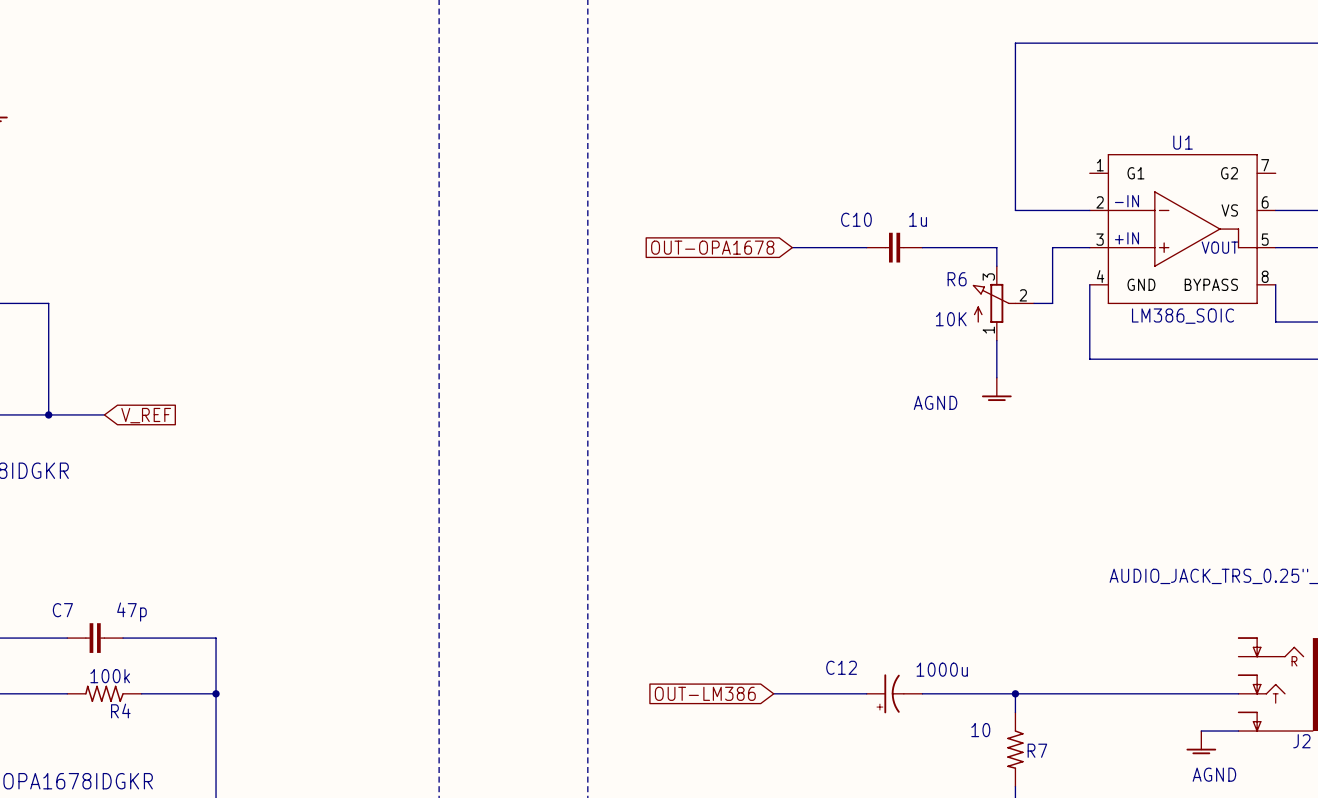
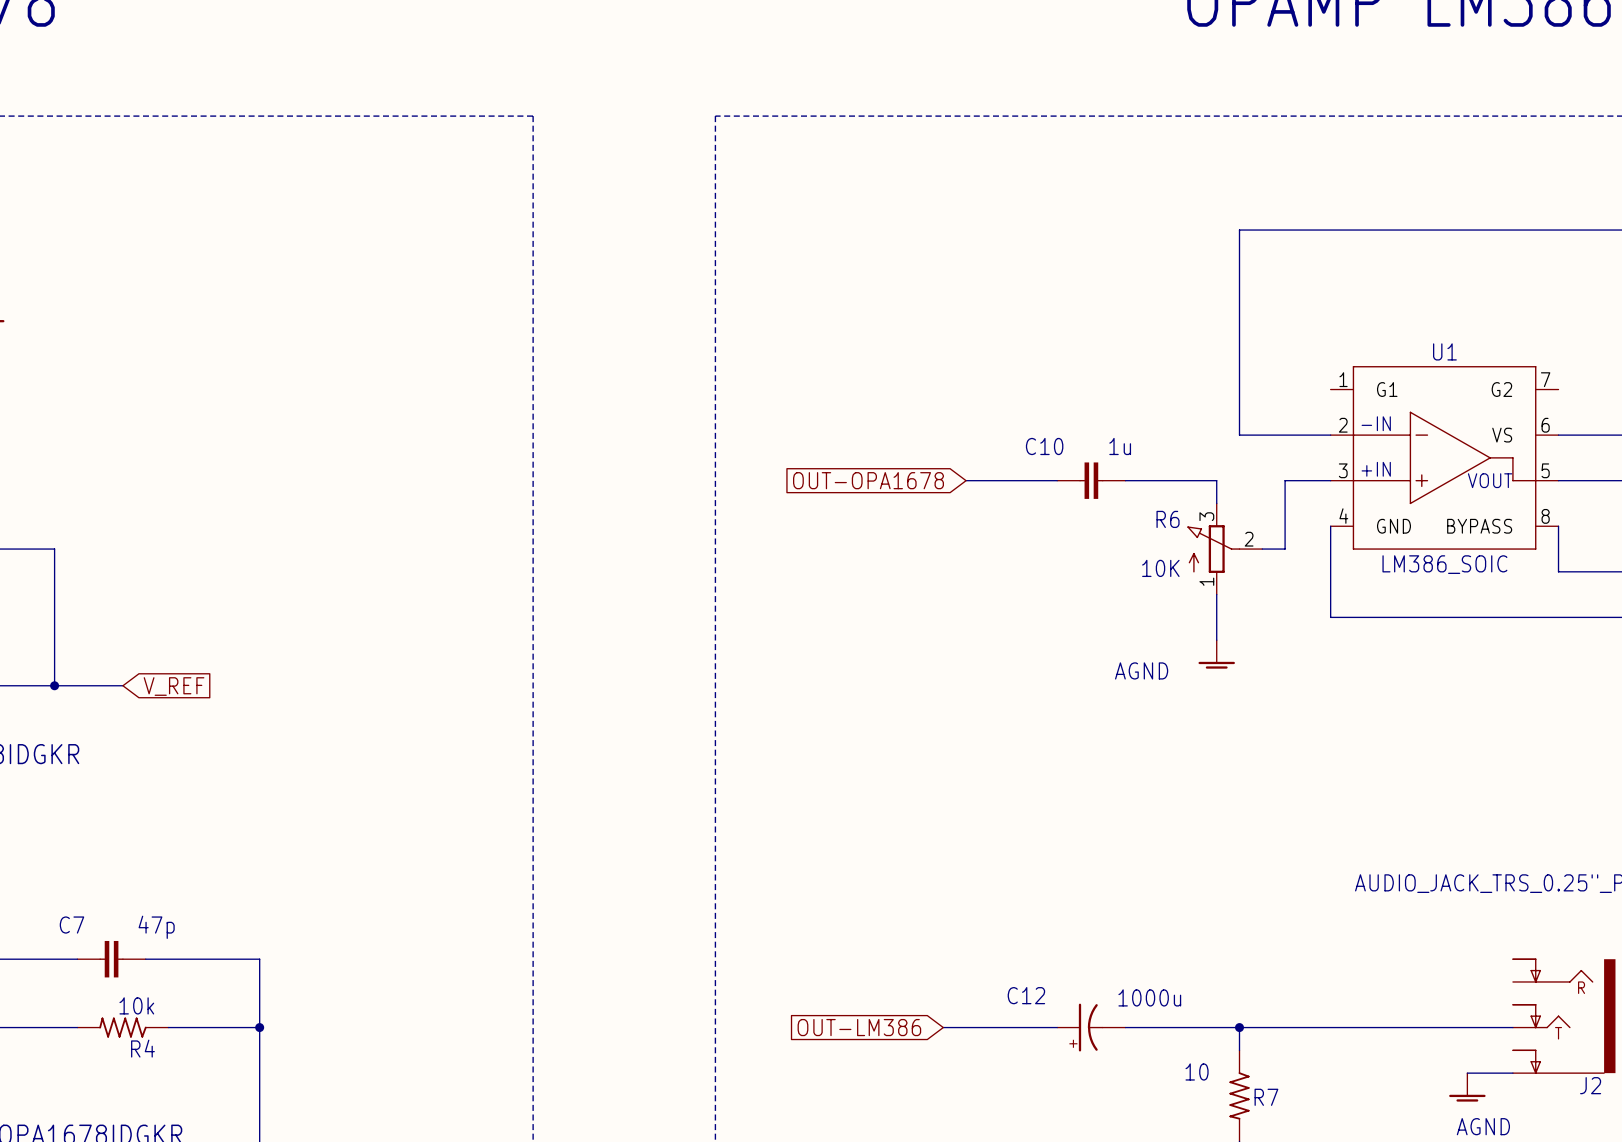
R4 value: 100k (110, 676) -> 10k (136, 1005)

